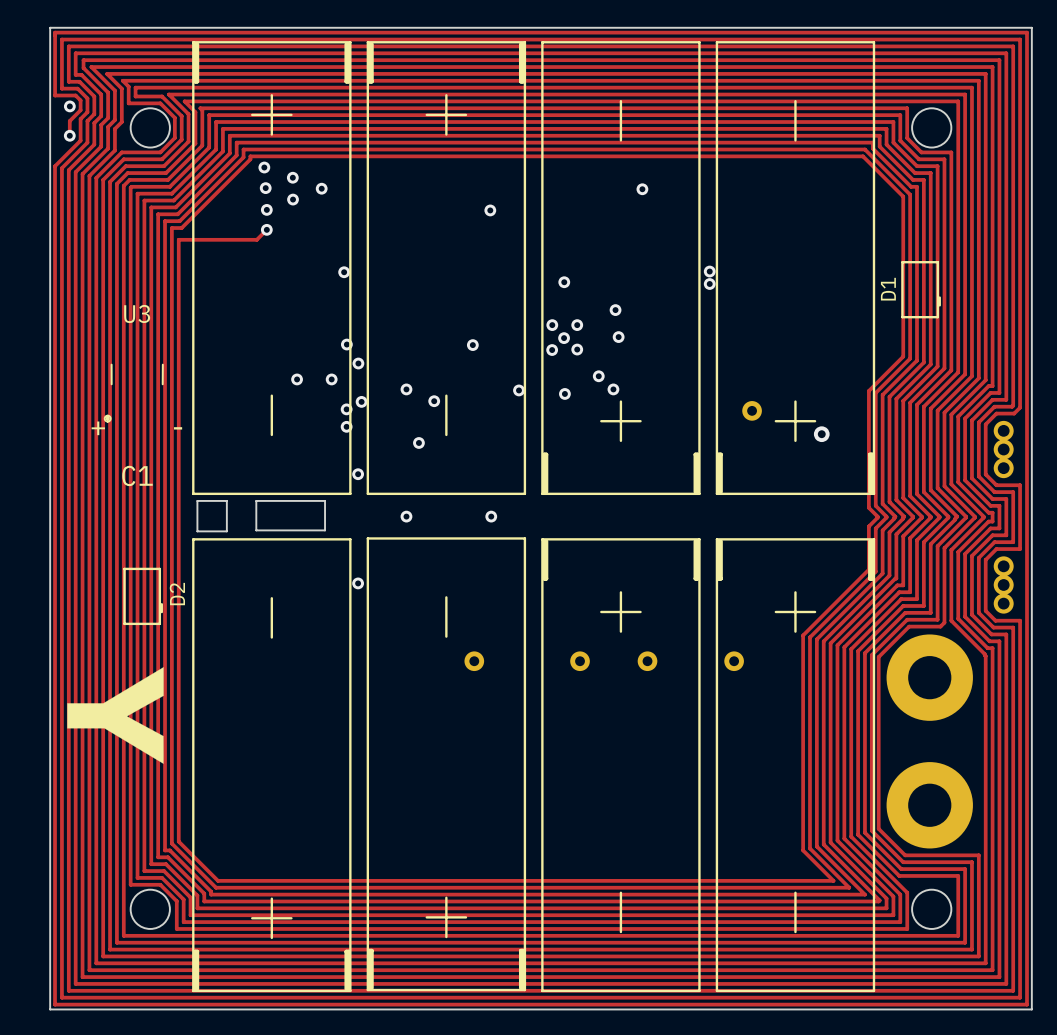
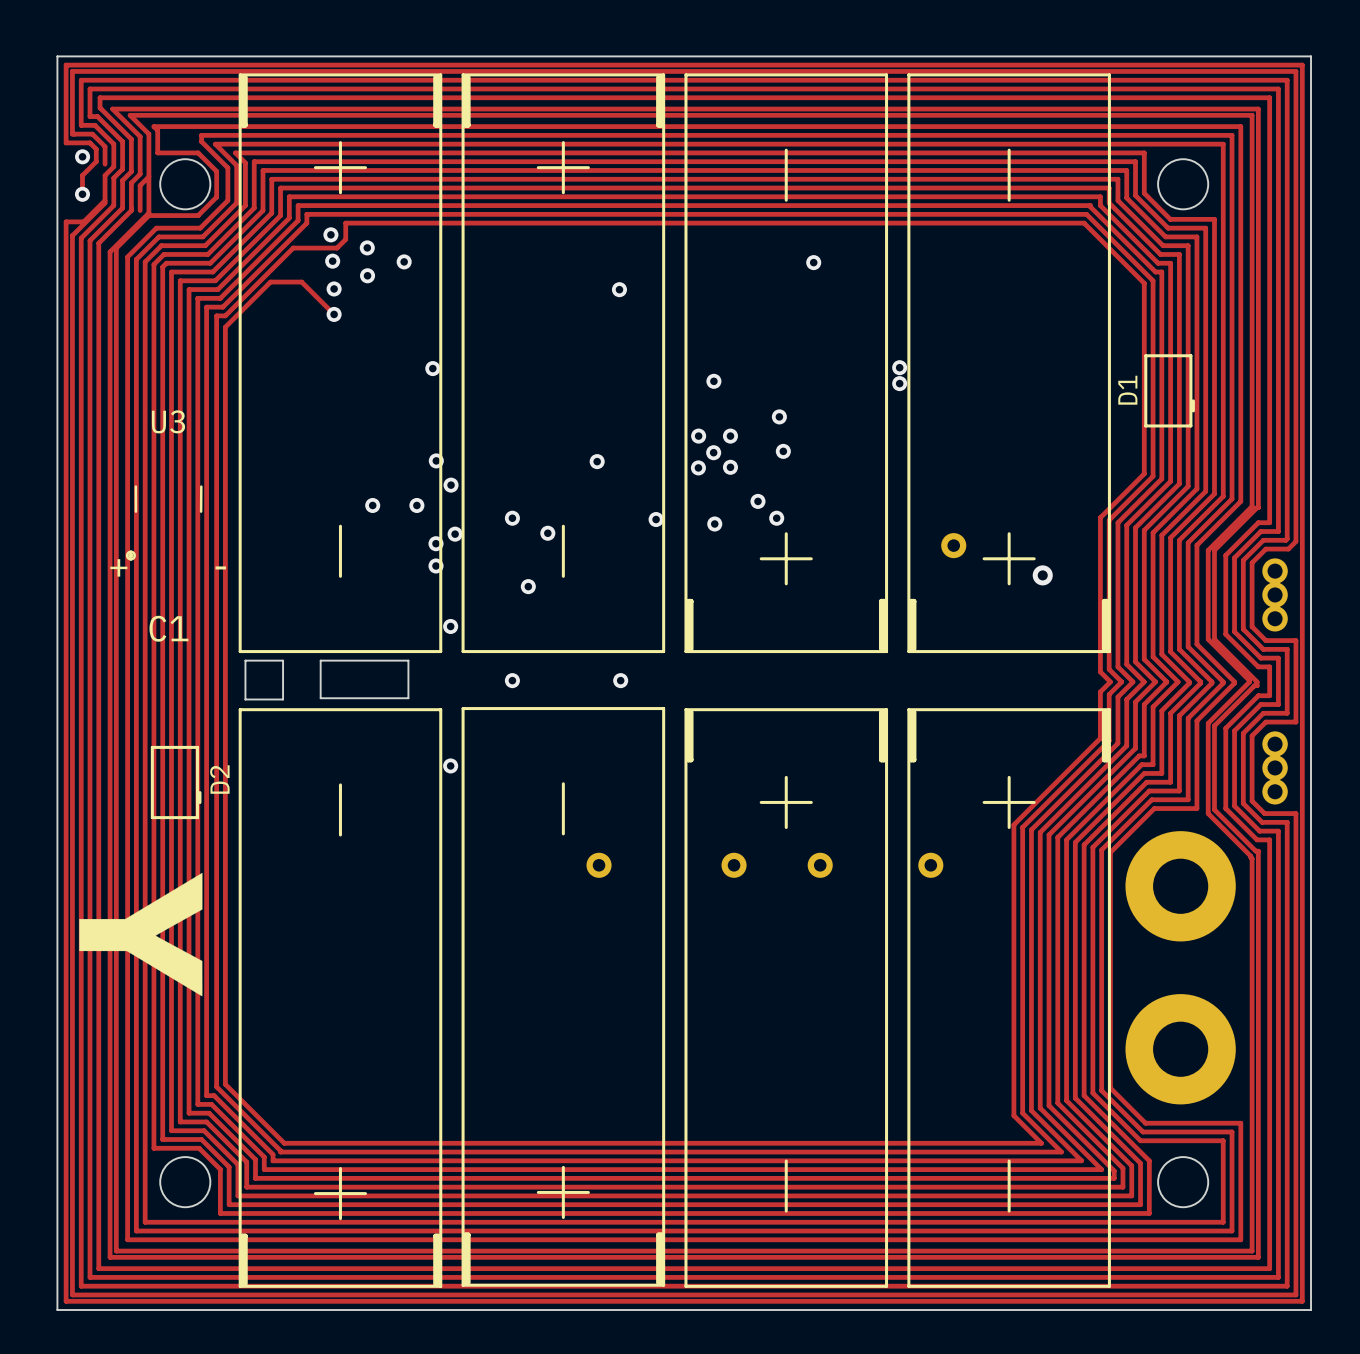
track: (93, 69) (91, 67) (992, 67) (992, 386) (988, 386) (958, 416) (958, 482) (988, 512) (992, 512) (992, 521) (988, 521) (958, 551) (958, 618) (987, 648) (992, 648) (992, 970) (89, 970) (89, 176) (114, 148) -> (112, 109) (1258, 109) (1258, 507) (1214, 550) (1214, 639) (1257, 681) (1257, 685) (1254, 685) (1214, 725) (1214, 809) (1255, 851) (1258, 851) (1258, 1257) (110, 1257) (110, 251) (148, 213) (148, 176)
track: (128, 86) (122, 80) (978, 80) (978, 378) (944, 412) (944, 486) (974, 517) (944, 548) (944, 622) (940, 626) (909, 626) (878, 657) (878, 828) (905, 855) (978, 855) (978, 956) (103, 956) (103, 179) (123, 159) (162, 159) (181, 139) (181, 116) (162, 96) (135, 96) (135, 87) (971, 87) (971, 376) (937, 410) (937, 488) (966, 517) (937, 546) (937, 619) (907, 619) (871, 655) (871, 830) (903, 862) (971, 862) (971, 949) (110, 949) (110, 181) (125, 166) (164, 166) (188, 141) (188, 114) (168, 94) (965, 94) (965, 374) (930, 408) (930, 490) (957, 516) (930, 544) (930, 612) (905, 612) (864, 653) (864, 832) (901, 869) (965, 869) (965, 942) (116, 942) (116, 183) (127, 173) (166, 173) (195, 143) (195, 112) (184, 101) (958, 101) (958, 372) (923, 406) (923, 492) (948, 517) (923, 542) (923, 605) (903, 605) (858, 651) (858, 834) (899, 875) (958, 875) (958, 935) (123, 935) (123, 185) (129, 179) (167, 179) (202, 145) (202, 110) (200, 108) (907, 108) (907, 138) (921, 152) (951, 152) (951, 370) (916, 404) (916, 494) (939, 517) (916, 540) (916, 599) (901, 599) (851, 649) (851, 836) (907, 892) (907, 928) (176, 928) (176, 901) (160, 884) (130, 884) (130, 187) (169, 186) (209, 147) (209, 115) (900, 115) (900, 140) (918, 159) (944, 159) (944, 368) (910, 402) (910, 496) (930, 517) (910, 538) (910, 592) (899, 592) (844, 647) (844, 838) (900, 894) (900, 922) (183, 922) (183, 899) (162, 877) (137, 877) (137, 193) (171, 193) (216, 149) (216, 122) (893, 122) (893, 142) (916, 166) (937, 166) (937, 366) (903, 400) (903, 498) (921, 517) (903, 536) (903, 585) (897, 585) (837, 645) (837, 840) (893, 896) (893, 915) (190, 915) (190, 897) (164, 871) (144, 871) (144, 200) (173, 200) (222, 151) (222, 128) (886, 128) (886, 144) (915, 173) (930, 173) (930, 364) (896, 398) (896, 499) (913, 517) (896, 534) (896, 578) (830, 643) (830, 842) (886, 898) (886, 908) (197, 908) (197, 895) (166, 864) (151, 864) (151, 207) (175, 207) (229, 153) (229, 135) (879, 135) (879, 146) (913, 179) (923, 179) (923, 362) (889, 396) (889, 501) (904, 516) (889, 532) (889, 575) (823, 641) (823, 844) (878, 901) (204, 901) (204, 893) (167, 857) (158, 857) (158, 214) (177, 214) (236, 155) (236, 142) (872, 142) (872, 148) (911, 186) (916, 186) (916, 360) (882, 394) (882, 503) (895, 516) (882, 530) (882, 573) (816, 639) (816, 846) (864, 894) (211, 894) (211, 891) (169, 850) (165, 850) (165, 221) (179, 221) (243, 157) (243, 149) (864, 149) (910, 194) (910, 358) (875, 392) (875, 505) (886, 516) (875, 528) (875, 571) (809, 637) (809, 848) (849, 887) (216, 887) (171, 843) (171, 228) (181, 228) (250, 159) (250, 156) (863, 156) (903, 196) (903, 356) (868, 391) (868, 507) (877, 516) (868, 526) (868, 569) (803, 635) (803, 850) (833, 880) (218, 880) (178, 841) (178, 239) (256, 239) (266, 229) -> (157, 131) (153, 126) (1240, 126) (1240, 501) (1196, 545) (1196, 644) (1234, 683) (1196, 720) (1196, 808) (1154, 808) (1110, 852) (1110, 1088) (1145, 1123) (1240, 1123) (1240, 1239) (127, 1239) (127, 256) (156, 228) (200, 228) (227, 200) (227, 167) (201, 141) (201, 135) (1232, 135) (1232, 498) (1188, 542) (1188, 646) (1223, 683) (1188, 718) (1188, 799) (1151, 799) (1101, 849) (1101, 1090) (1143, 1131) (1232, 1131) (1232, 1231) (136, 1231) (136, 259) (158, 236) (202, 236) (236, 203) (236, 165) (215, 144) (1223, 144) (1223, 496) (1179, 540) (1179, 649) (1211, 683) (1179, 715) (1179, 791) (1149, 791) (1092, 847) (1092, 1093) (1140, 1140) (1223, 1140) (1223, 1222) (145, 1222) (145, 261) (161, 245) (205, 245) (245, 205) (245, 162) (235, 152) (1144, 152) (1144, 193) (1170, 219) (1214, 219) (1214, 493) (1170, 537) (1170, 651) (1200, 683) (1170, 713) (1170, 782) (1146, 782) (1084, 844) (1084, 1095) (1149, 1160) (1149, 1213) (220, 1213) (220, 1169) (199, 1148) (153, 1148) (153, 264) (163, 254) (207, 254) (254, 208) (254, 161) (1135, 161) (1135, 195) (1168, 228) (1205, 228) (1205, 491) (1161, 535) (1161, 654) (1189, 683) (1161, 710) (1161, 773) (1144, 773) (1075, 842) (1075, 1098) (1140, 1163) (1140, 1204) (229, 1204) (229, 1167) (201, 1139) (162, 1139) (162, 267) (166, 263) (210, 263) (263, 210) (263, 170) (1126, 170) (1126, 198) (1165, 236) (1196, 236) (1196, 488) (1153, 532) (1153, 656) (1178, 681) (1153, 707) (1153, 764) (1141, 764) (1066, 839) (1066, 1100) (1131, 1165) (1131, 1195) (237, 1195) (237, 1164) (204, 1130) (171, 1130) (171, 272) (212, 272) (271, 213) (271, 179) (1117, 179) (1117, 200) (1163, 245) (1188, 245) (1188, 486) (1144, 530) (1144, 659) (1166, 681) (1144, 704) (1144, 755) (1139, 755) (1057, 837) (1057, 1103) (1122, 1168) (1122, 1187) (246, 1187) (246, 1162) (206, 1121) (180, 1121) (180, 280) (215, 280) (280, 215) (280, 188) (1109, 188) (1109, 203) (1160, 254) (1179, 254) (1179, 483) (1135, 527) (1135, 661) (1155, 681) (1135, 702) (1135, 748) (1049, 834) (1049, 1105) (1114, 1170) (1114, 1178) (255, 1178) (255, 1159) (209, 1113) (189, 1113) (189, 289) (217, 289) (289, 218) (289, 196) (1100, 196) (1100, 205) (1158, 263) (1170, 263) (1170, 481) (1126, 525) (1126, 664) (1144, 681) (1126, 699) (1126, 745) (1040, 832) (1040, 1108) (1101, 1169) (264, 1169) (264, 1157) (211, 1104) (197, 1104) (197, 298) (220, 298) (298, 220) (298, 205) (1090, 205) (1155, 272) (1161, 272) (1161, 478) (1117, 522) (1117, 666) (1133, 681) (1117, 696) (1117, 743) (1031, 829) (1031, 1110) (1081, 1160) (273, 1160) (273, 1154) (214, 1095) (206, 1095) (206, 307) (222, 307) (306, 223) (306, 214) (1086, 214) (1153, 280) (1153, 476) (1109, 520) (1109, 669) (1121, 681) (1109, 694) (1109, 740) (1022, 827) (1022, 1113) (1061, 1152) (280, 1152) (216, 1086) (216, 315) (225, 315) (293, 248) (337, 248) (345, 239) (345, 223) (1084, 223) (1144, 283) (1144, 473) (1100, 517) (1100, 671) (1110, 681) (1100, 691) (1100, 738) (1013, 824) (1013, 1115) (1041, 1143) (284, 1143) (225, 1084) (225, 327) (270, 282) (301, 282) (334, 314)
track: (56, 95) (55, 95) (55, 32) (1027, 32) (1027, 1004) (55, 1004) (55, 166) (80, 140) (80, 119) (87, 112) -> (66, 142) (66, 65) (1302, 65) (1302, 1301) (66, 1301) (66, 221) (83, 221) (105, 200)

